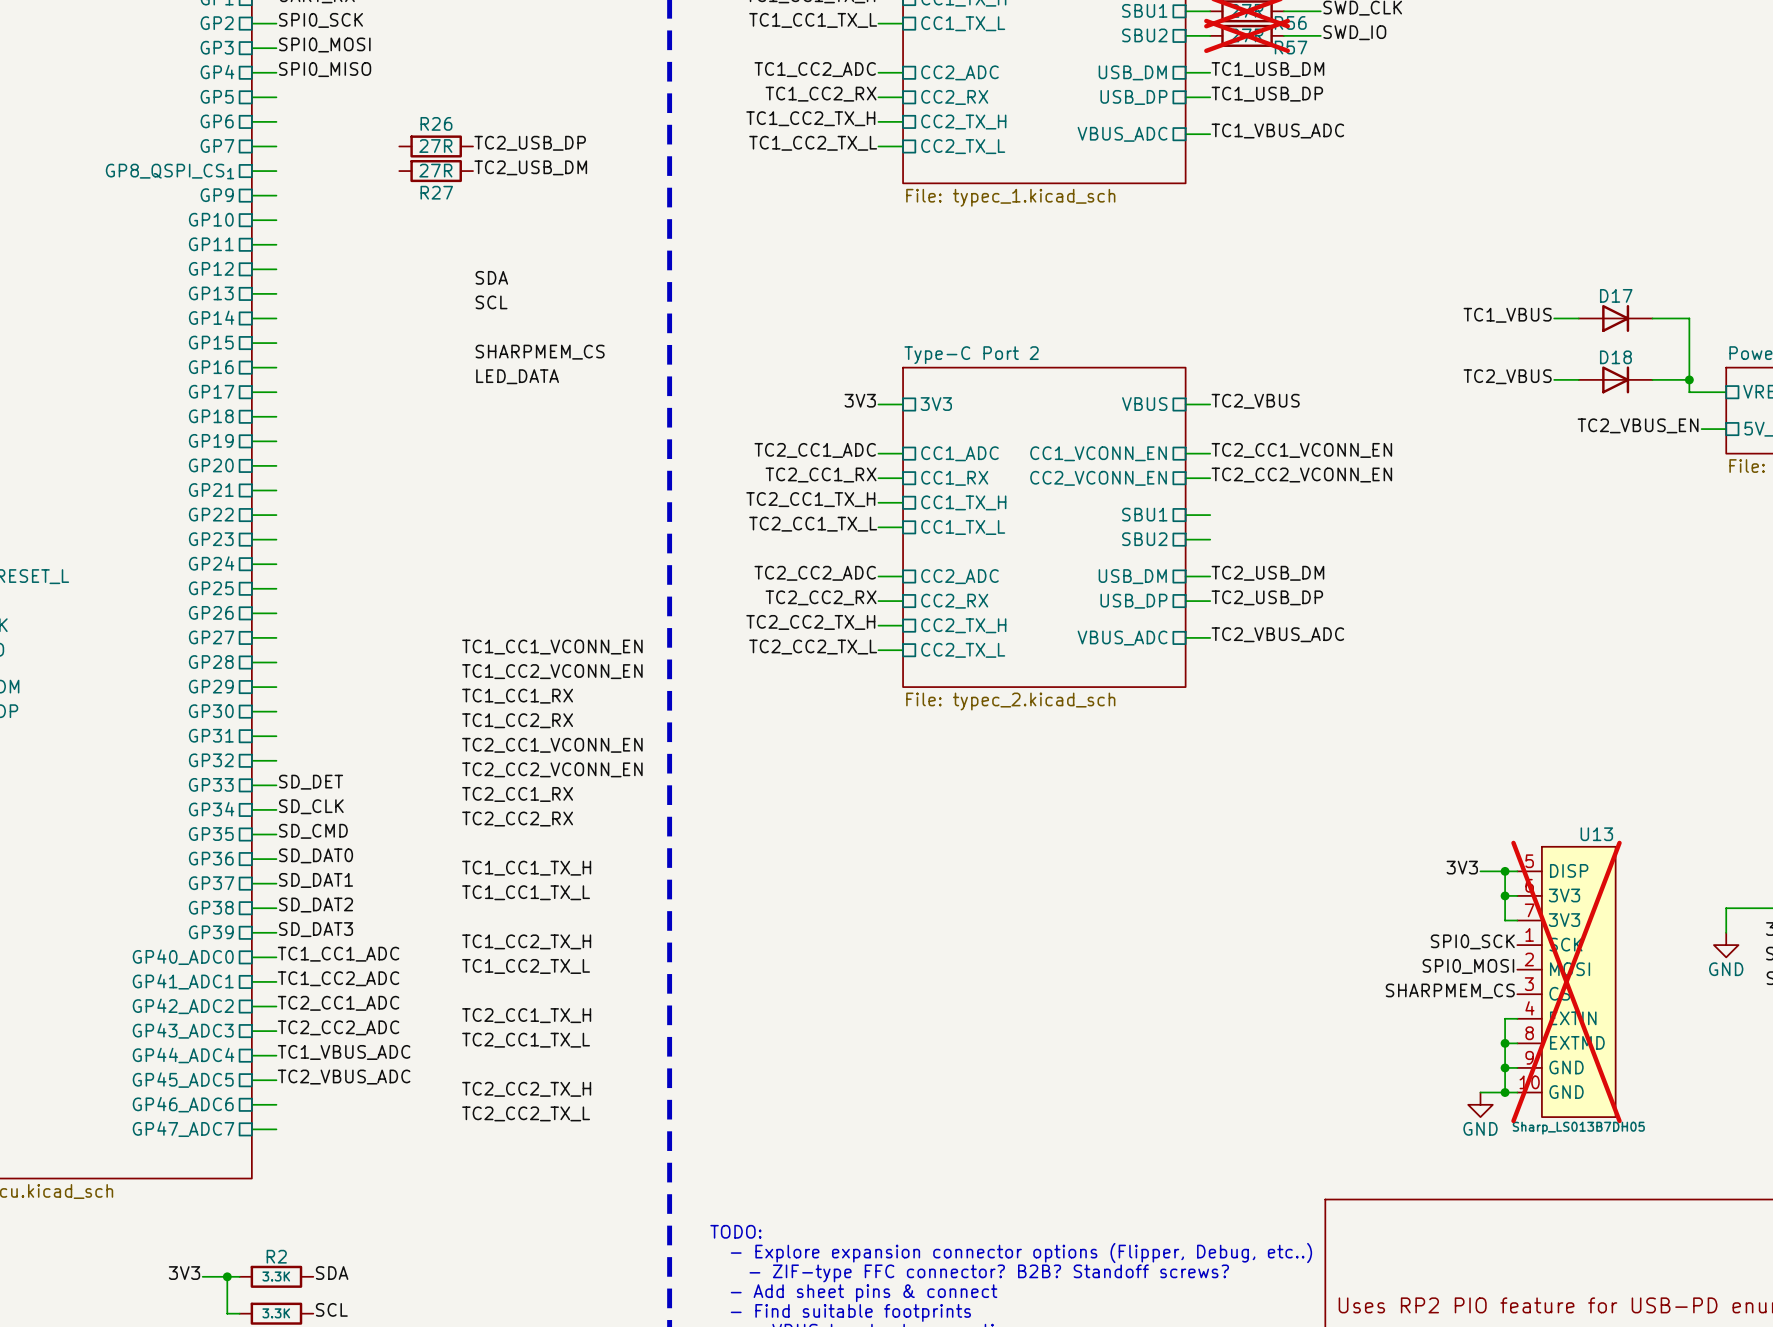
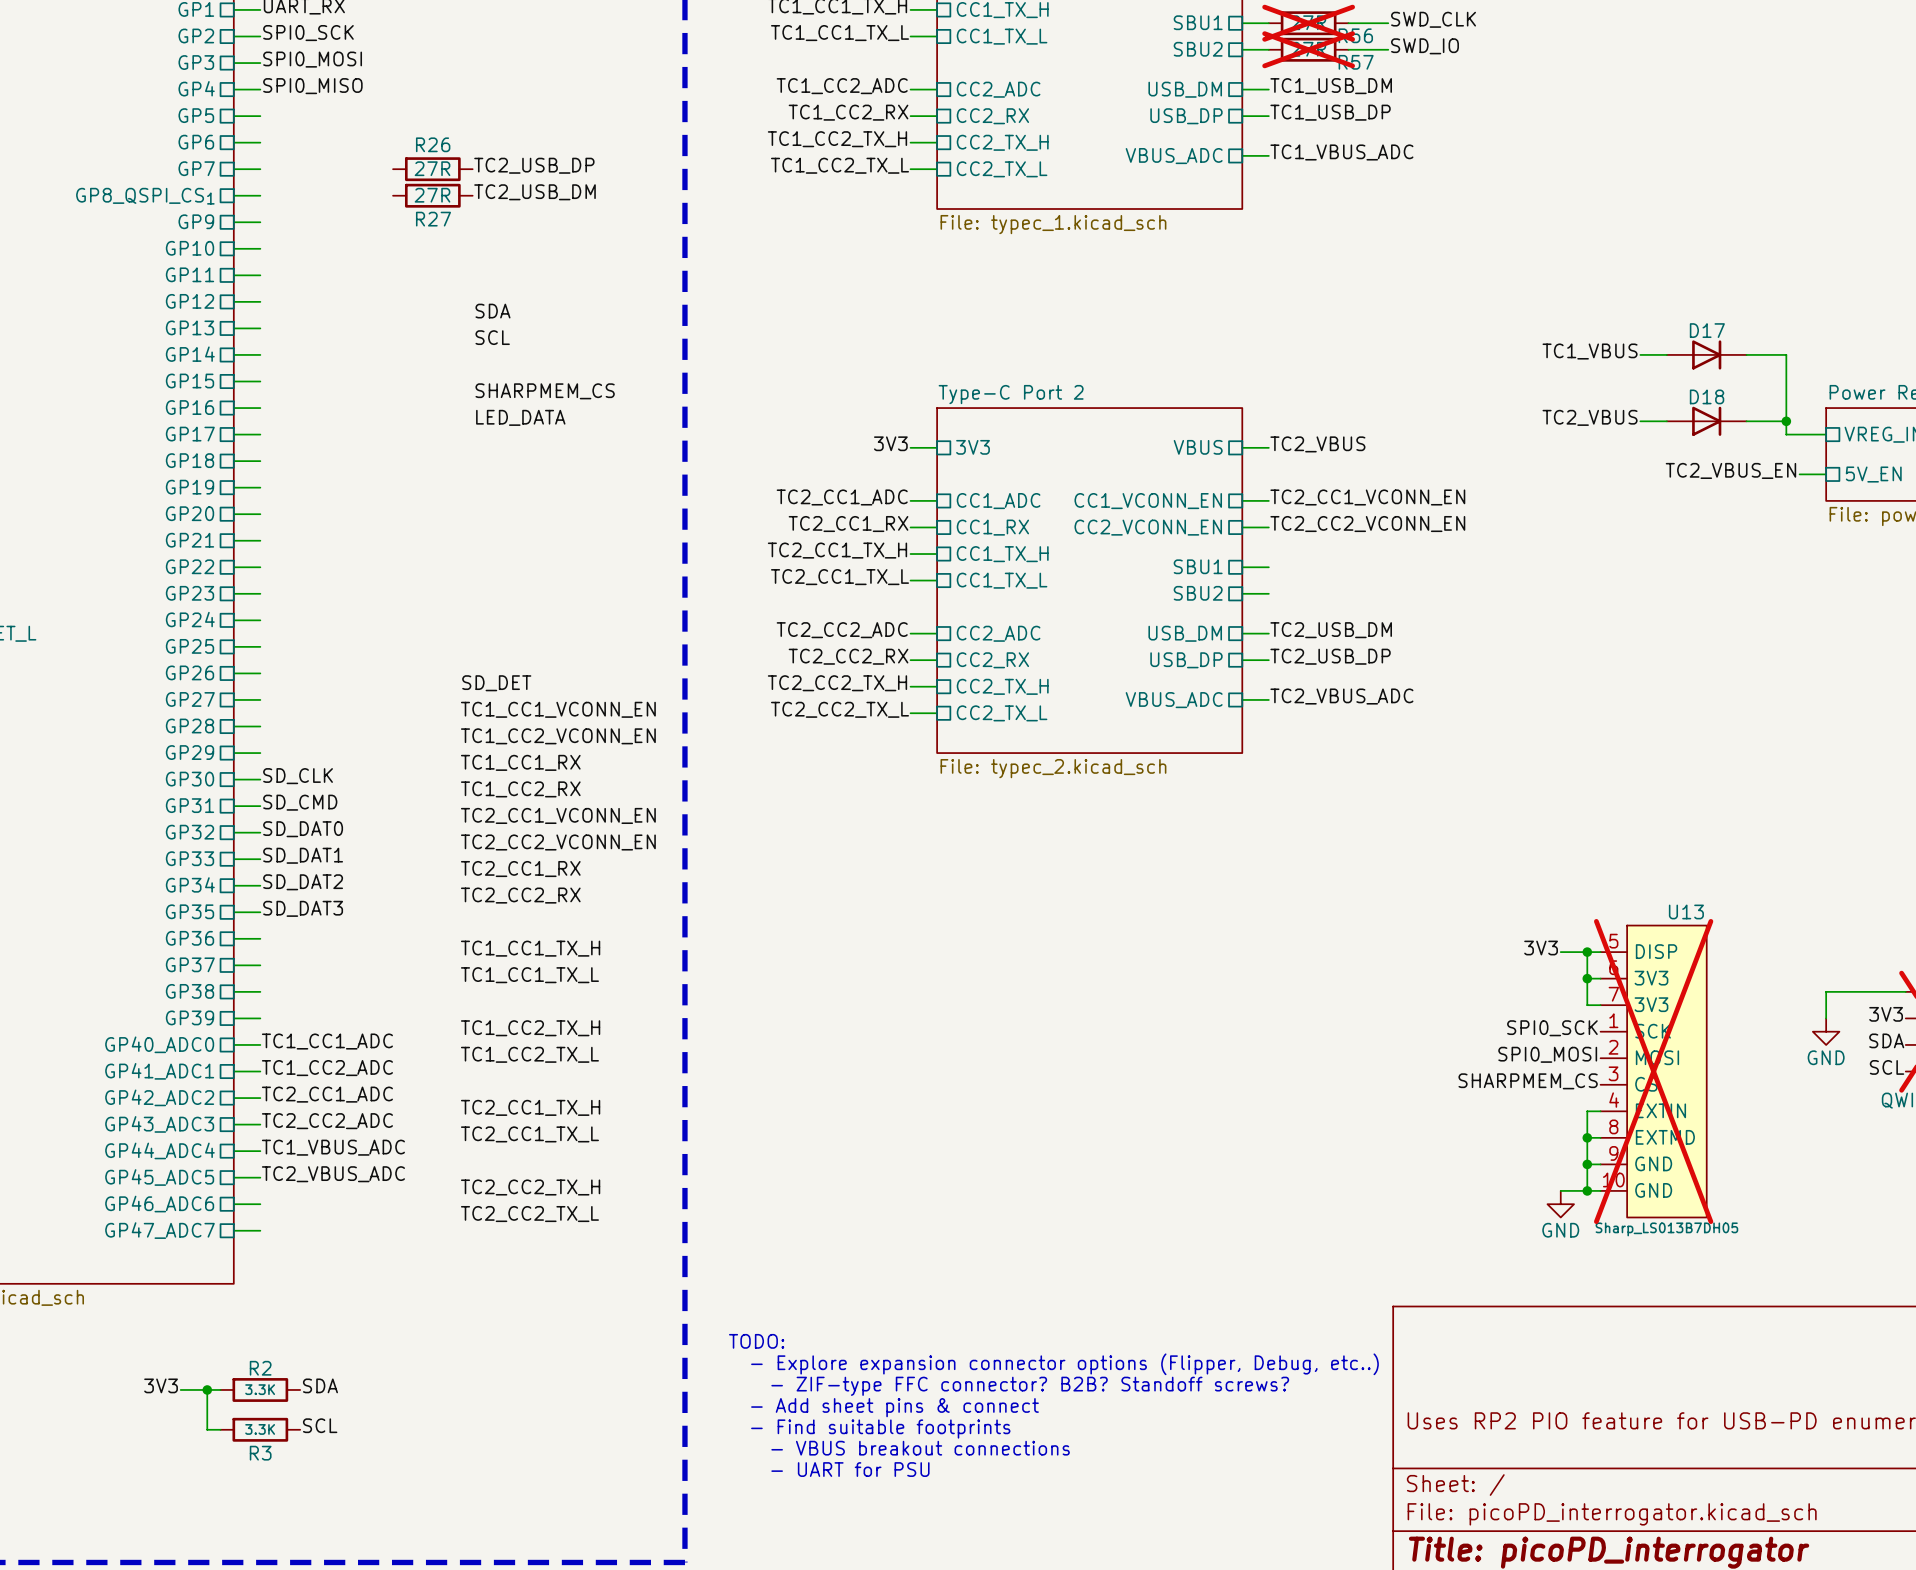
label: none -> SD_DET (496, 683)
label: none -> SD_CLK (298, 776)
label: none -> SD_CMD (300, 802)
label: SD_DET (311, 782) -> SD_DAT1 (303, 855)
label: SD_CLK (311, 806) -> SD_DAT2 (303, 882)
label: SD_CMD (313, 831) -> SD_DAT3 (303, 908)
label position: SD_DAT0 (316, 855) -> SD_DAT0 (303, 829)
label: SD_DAT1 (316, 880) -> none
label: SD_DAT2 (316, 905) -> none
label: SD_DAT3 (316, 929) -> none

